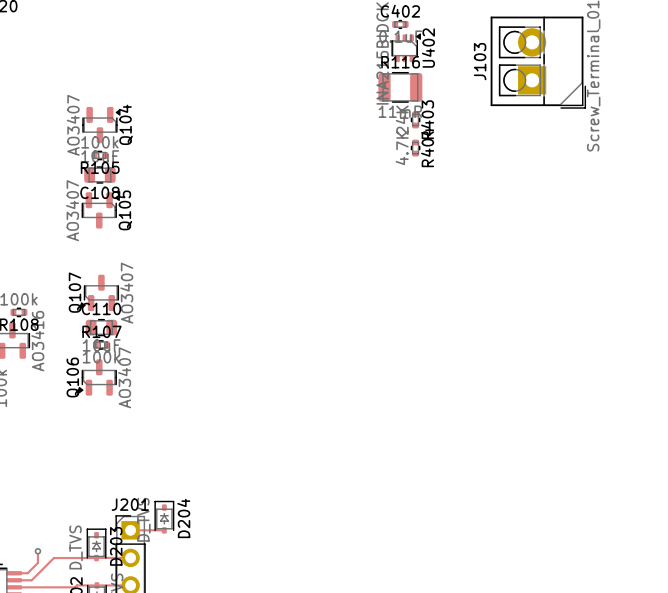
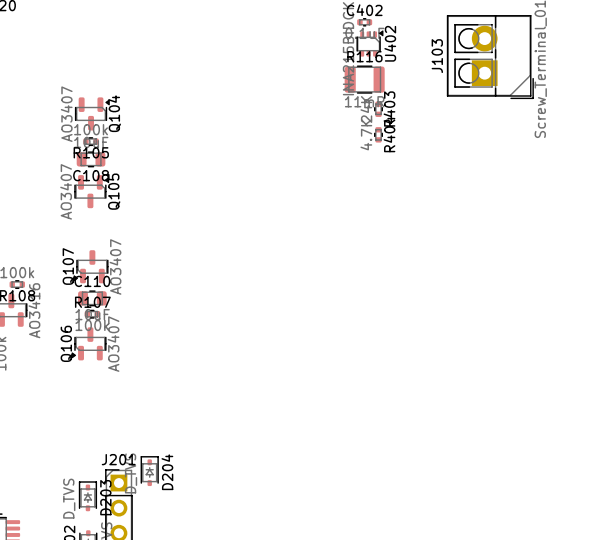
track: (130, 530) (164, 530) -> none
track: (37, 551) (37, 562) (27, 573) (14, 573) -> none
via: (37, 551) -> none
track: (130, 557) (53, 558) (31, 580) (14, 580) -> none
track: (130, 585) (14, 587) -> none

